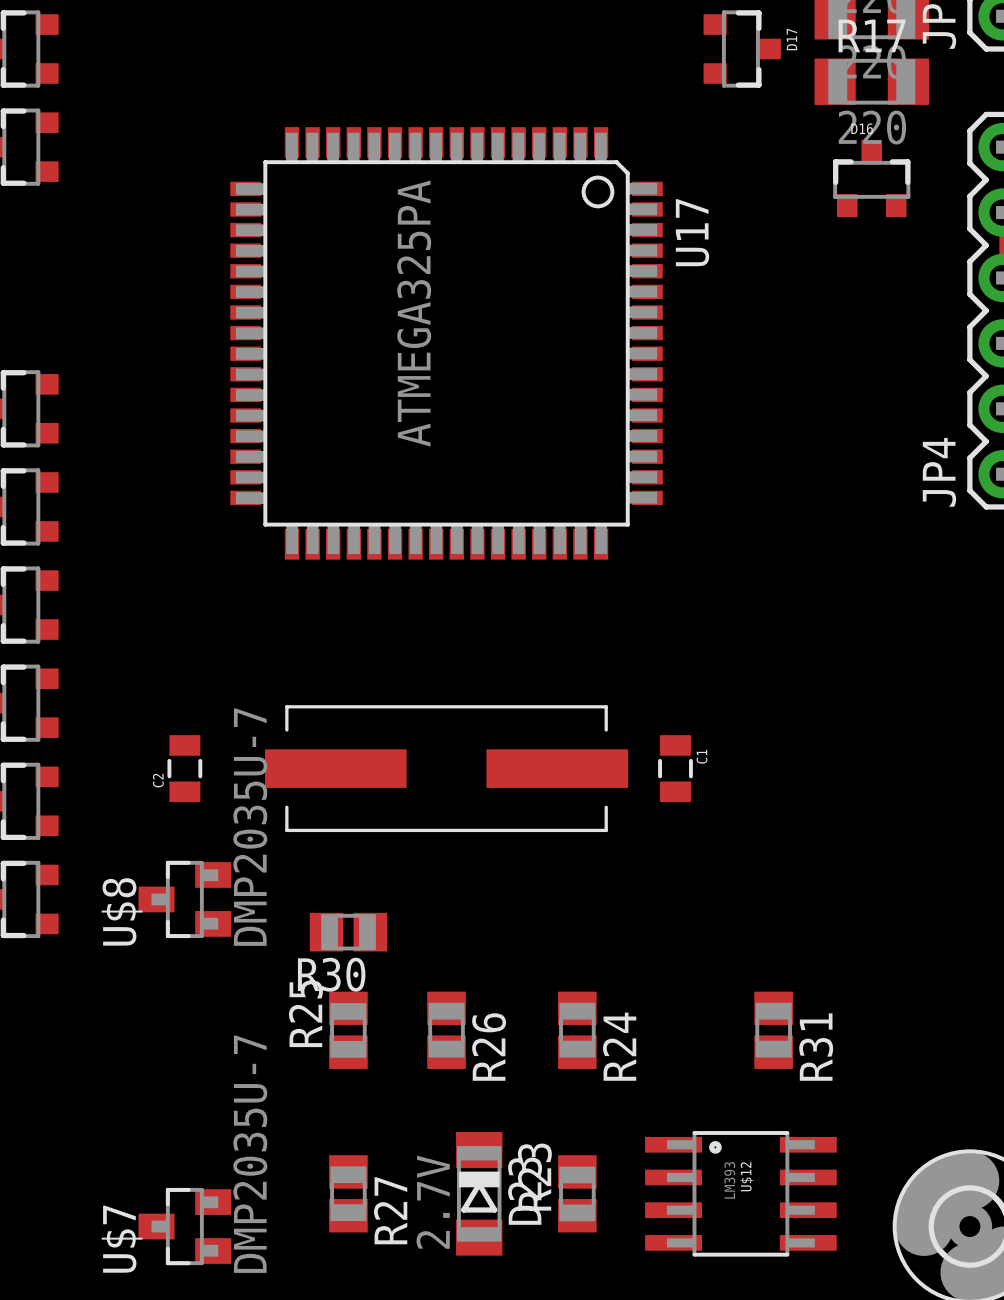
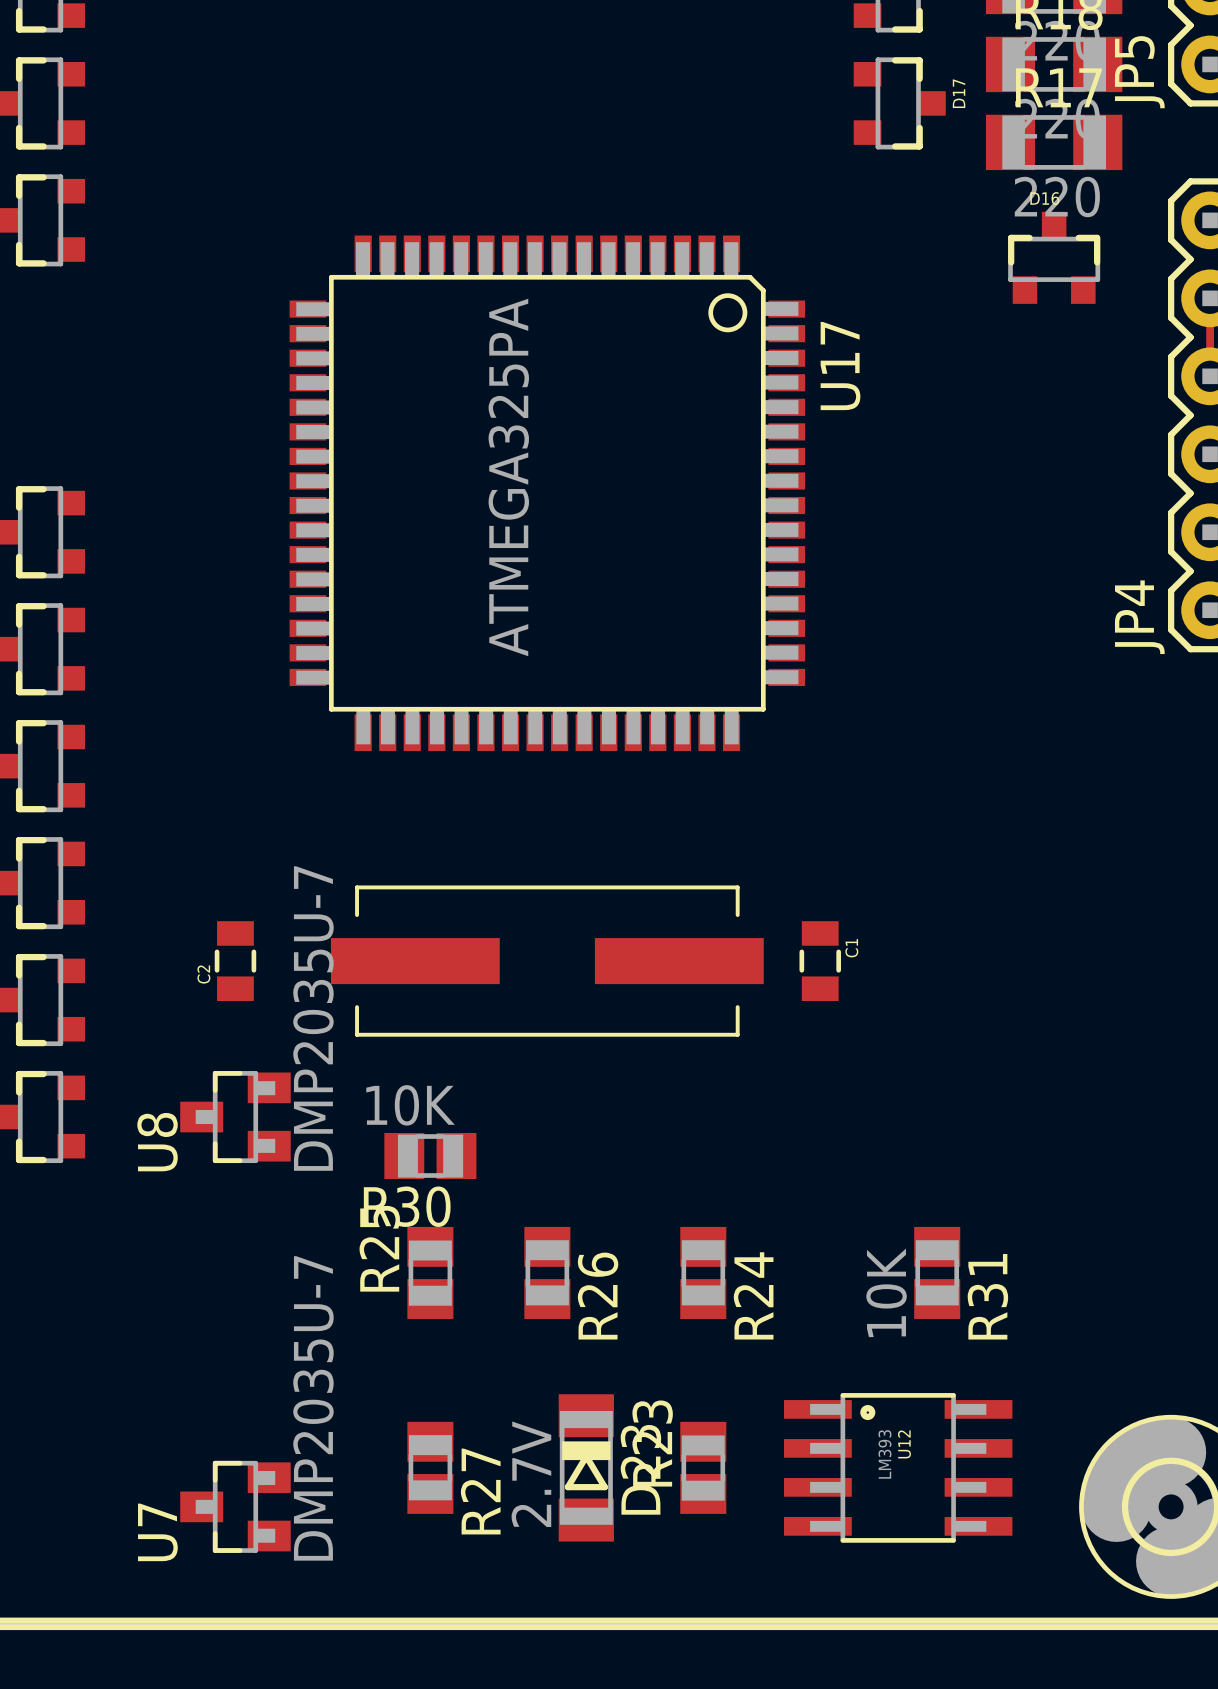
U17 position: (446, 343) -> (547, 493)
R30 value: none -> 10K (410, 1105)
U$8 name: U$8 (122, 911) -> U8 (157, 1142)
R31 value: none -> 10K (886, 1292)
U$12 name: U$12 (746, 1176) -> U12 (904, 1444)
U$7 name: U$7 (122, 1239) -> U7 (157, 1532)

